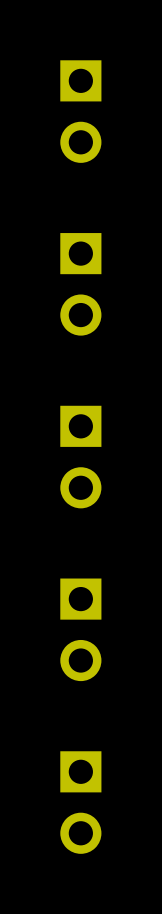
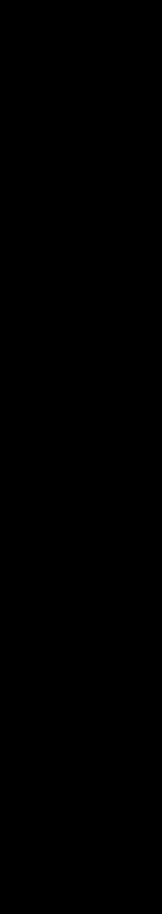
part: (80, 111) -> none
part: (80, 284) -> none
part: (80, 457) -> none
part: (80, 629) -> none
part: (80, 802) -> none

